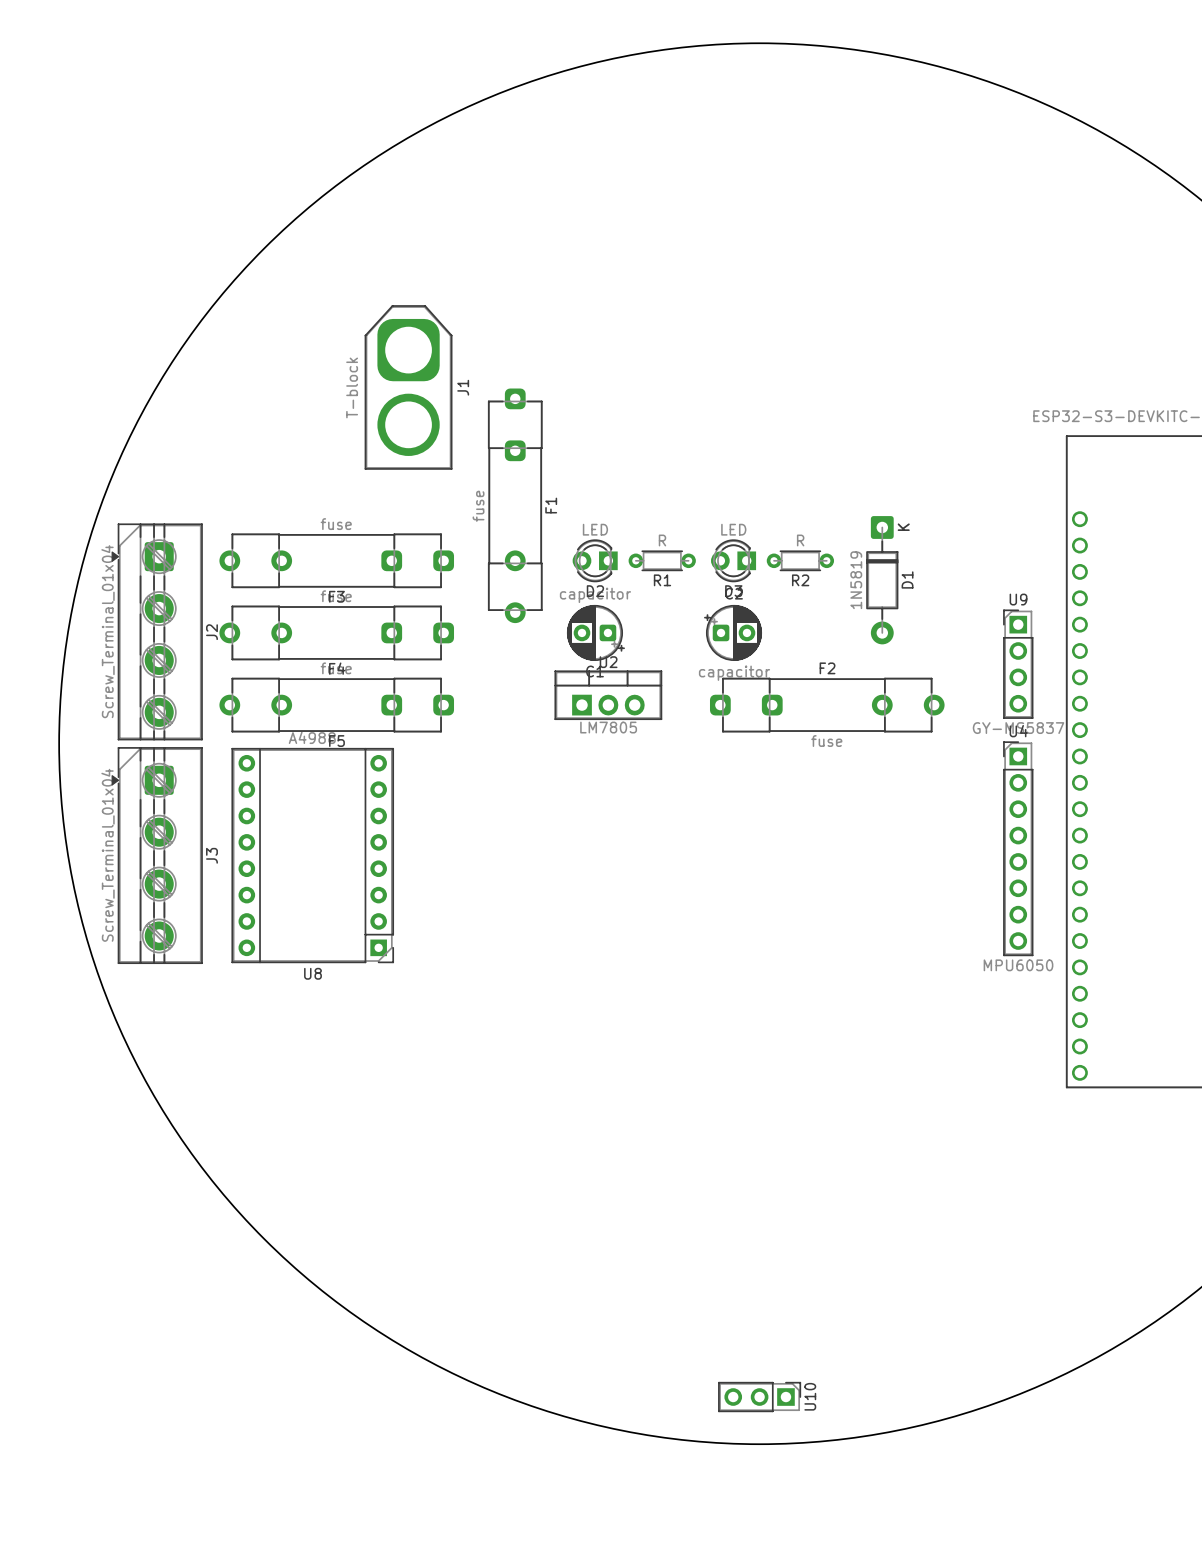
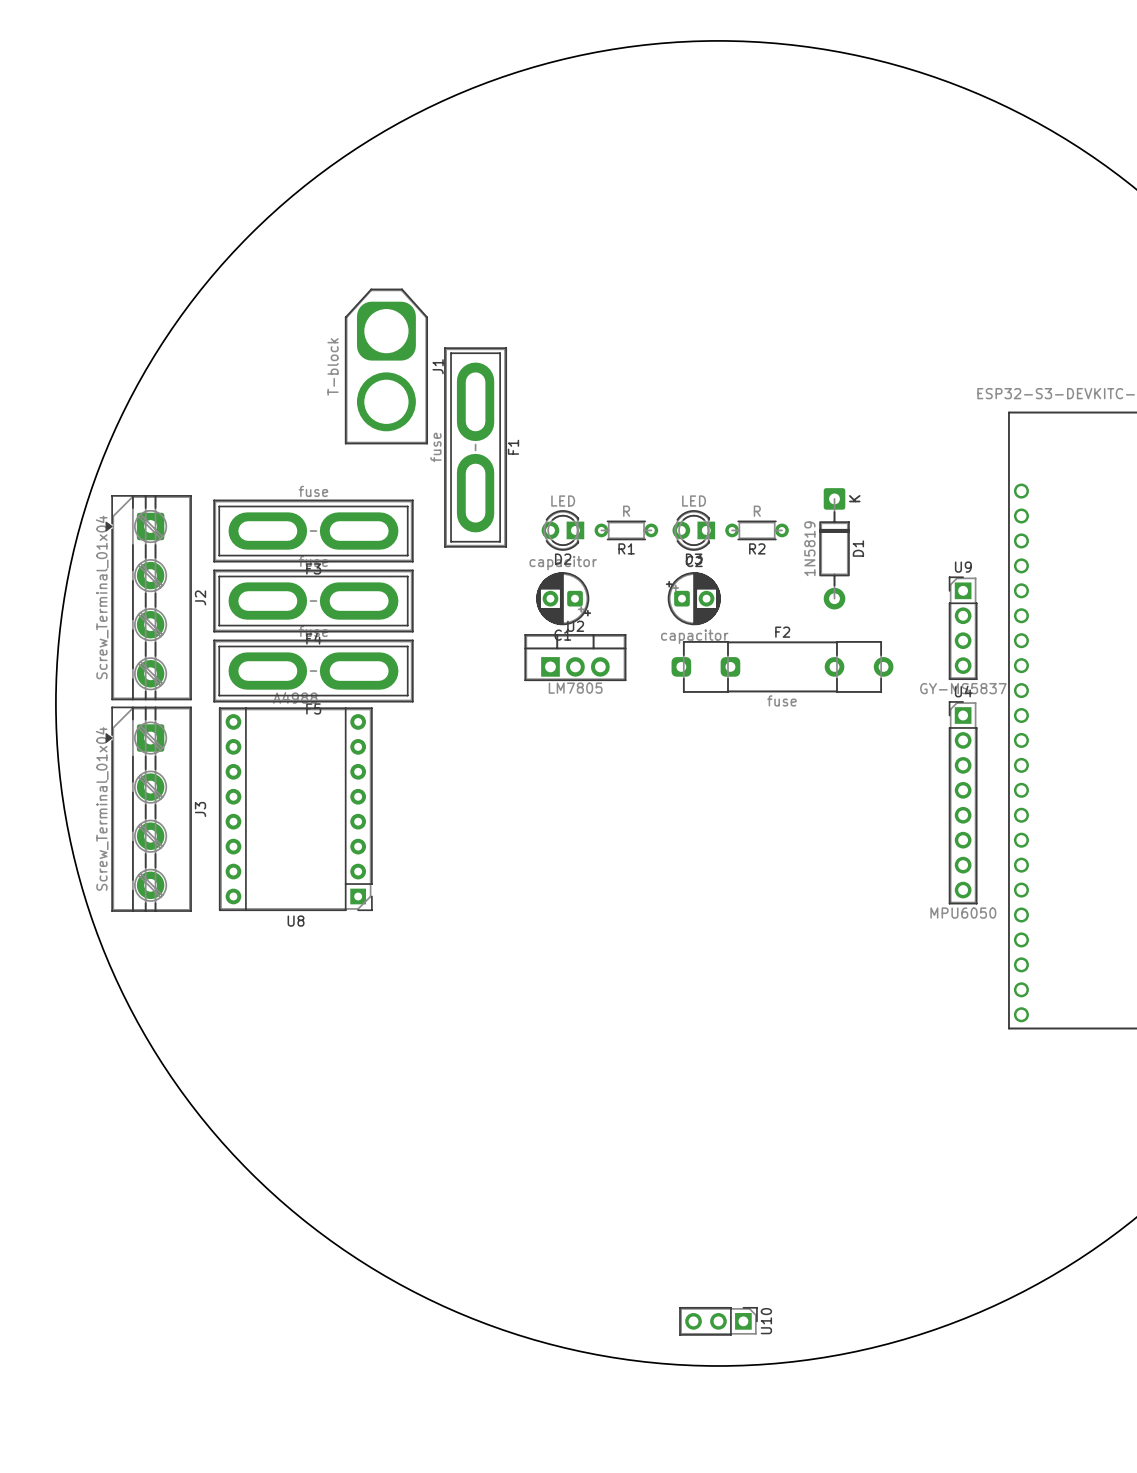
F1 footprint: [488, 388, 543, 624] -> [444, 347, 507, 548]
F3 footprint: [219, 533, 455, 588] -> [213, 499, 414, 563]
F4 footprint: [219, 605, 455, 661] -> [213, 569, 414, 633]
F5 footprint: [219, 678, 455, 733] -> [213, 639, 414, 703]

